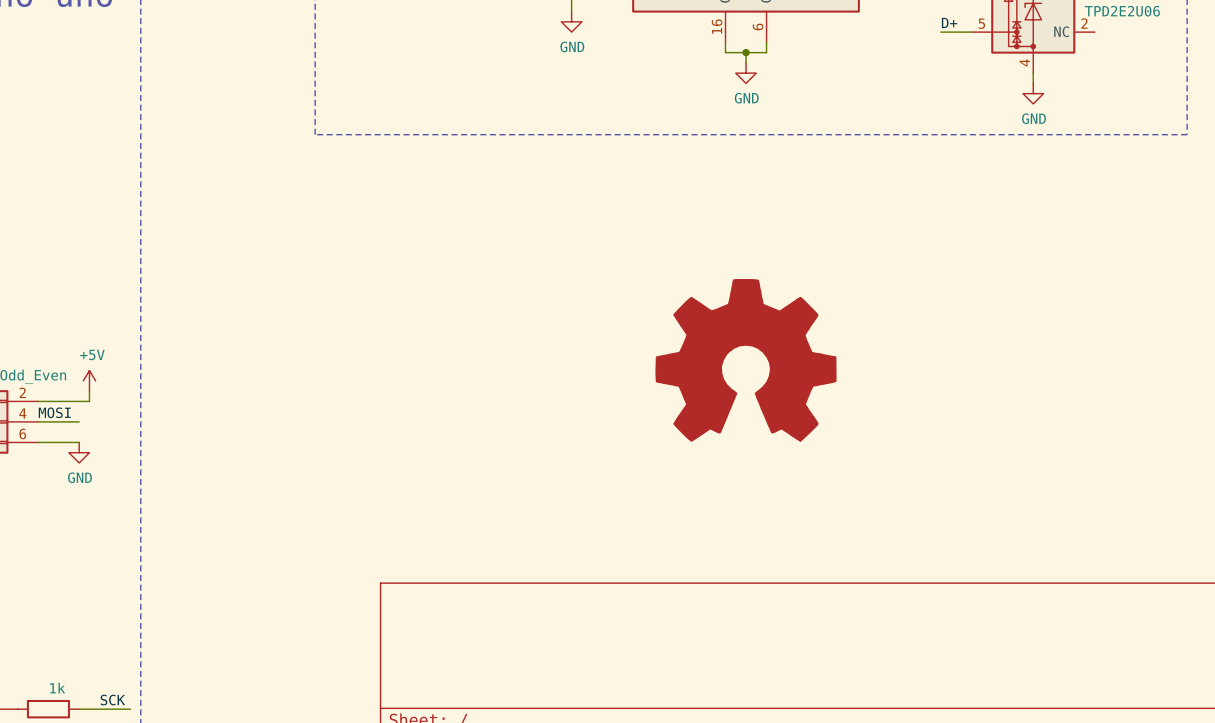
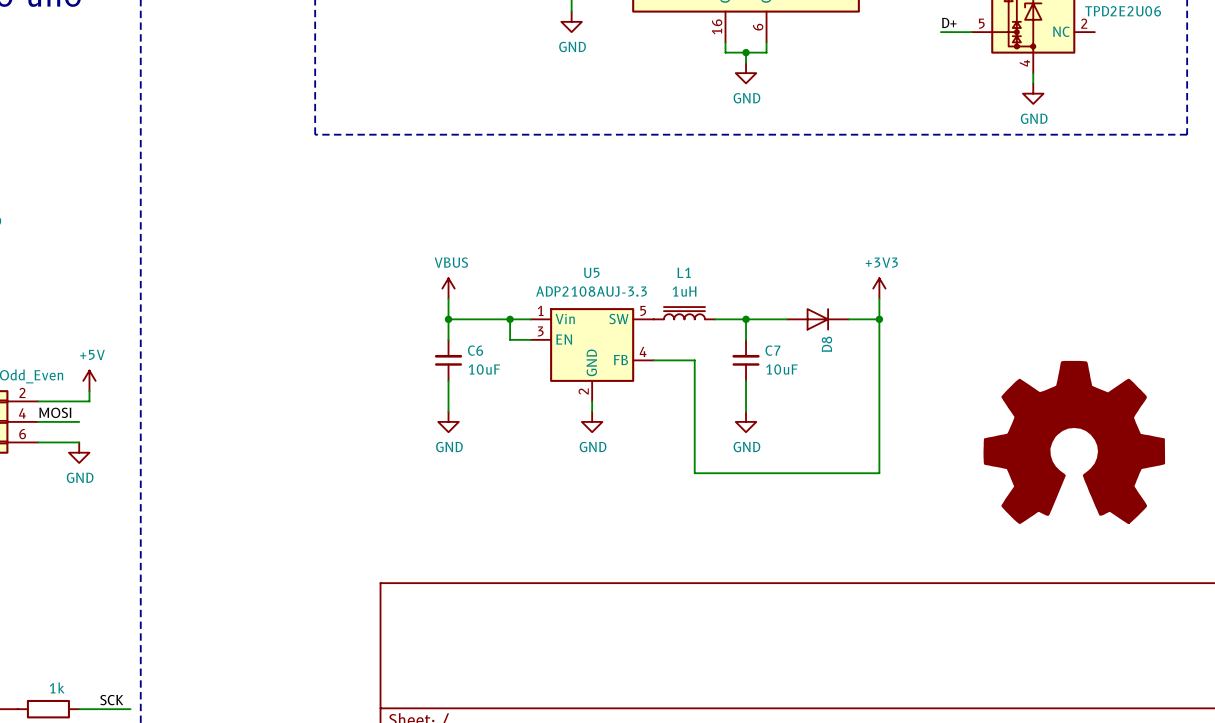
power symbol: none -> VBUS (448, 288)
power symbol: none -> +3V3 (879, 288)
wire: none -> (448, 298) (448, 339)
wire: none -> (879, 298) (879, 473) (694, 473) (694, 360) (653, 360)
L1: none -> 1uH (684, 313)
wire: none -> (448, 319) (530, 319)
junction: none -> (448, 319)
wire: none -> (510, 319) (510, 339) (530, 339)
junction: none -> (510, 319)
junction: none -> (746, 319)
D8: none -> (817, 319)
wire: none -> (848, 319) (879, 319)
junction: none -> (879, 319)
U5: none -> ADP2108AUJ-3.3 (592, 354)
C6: none -> 10uF (448, 360)
power symbol: (746, 360) -> none
C7: none -> 10uF (746, 360)
wire: none -> (448, 380) (448, 411)
wire: none -> (746, 380) (746, 411)
wire: none -> (592, 401) (592, 411)
power symbol: none -> GND (448, 421)
power symbol: none -> GND (592, 421)
power symbol: none -> GND (746, 421)
power symbol: none -> (1074, 442)

